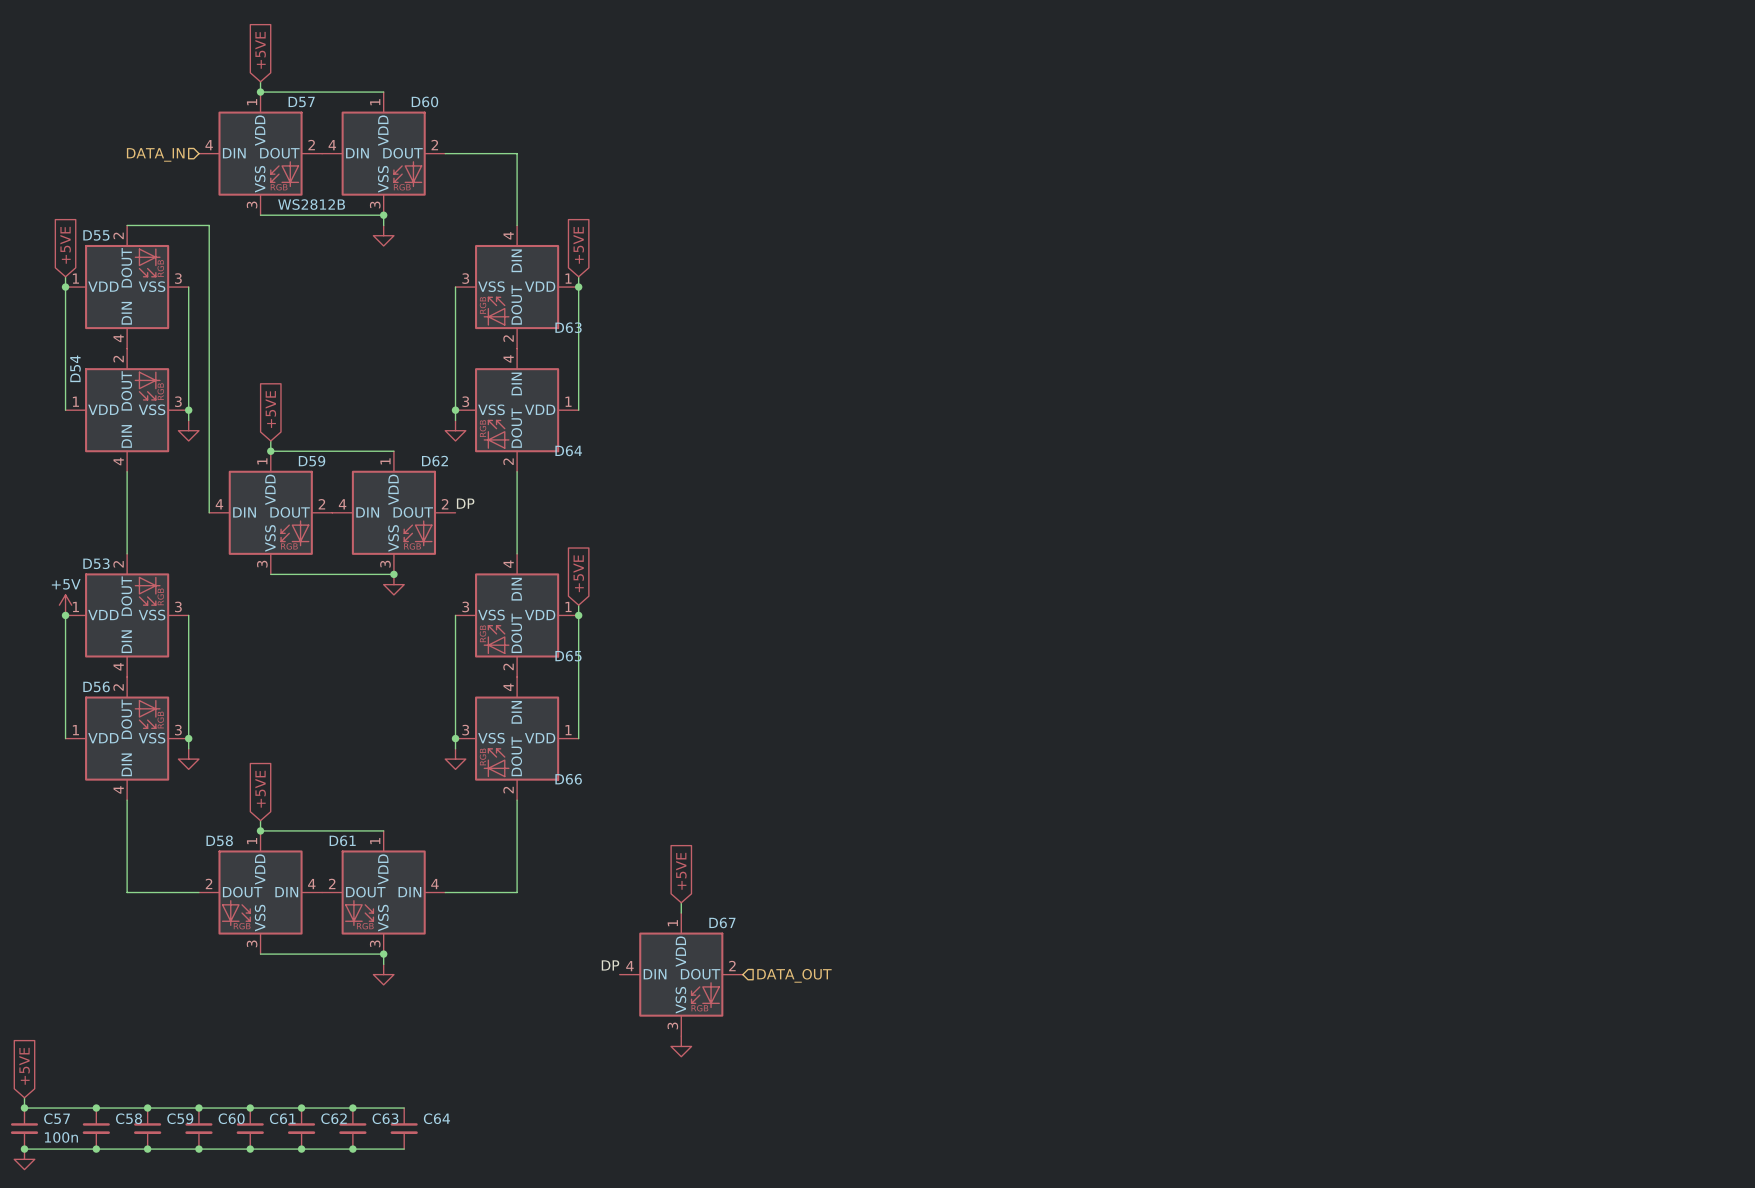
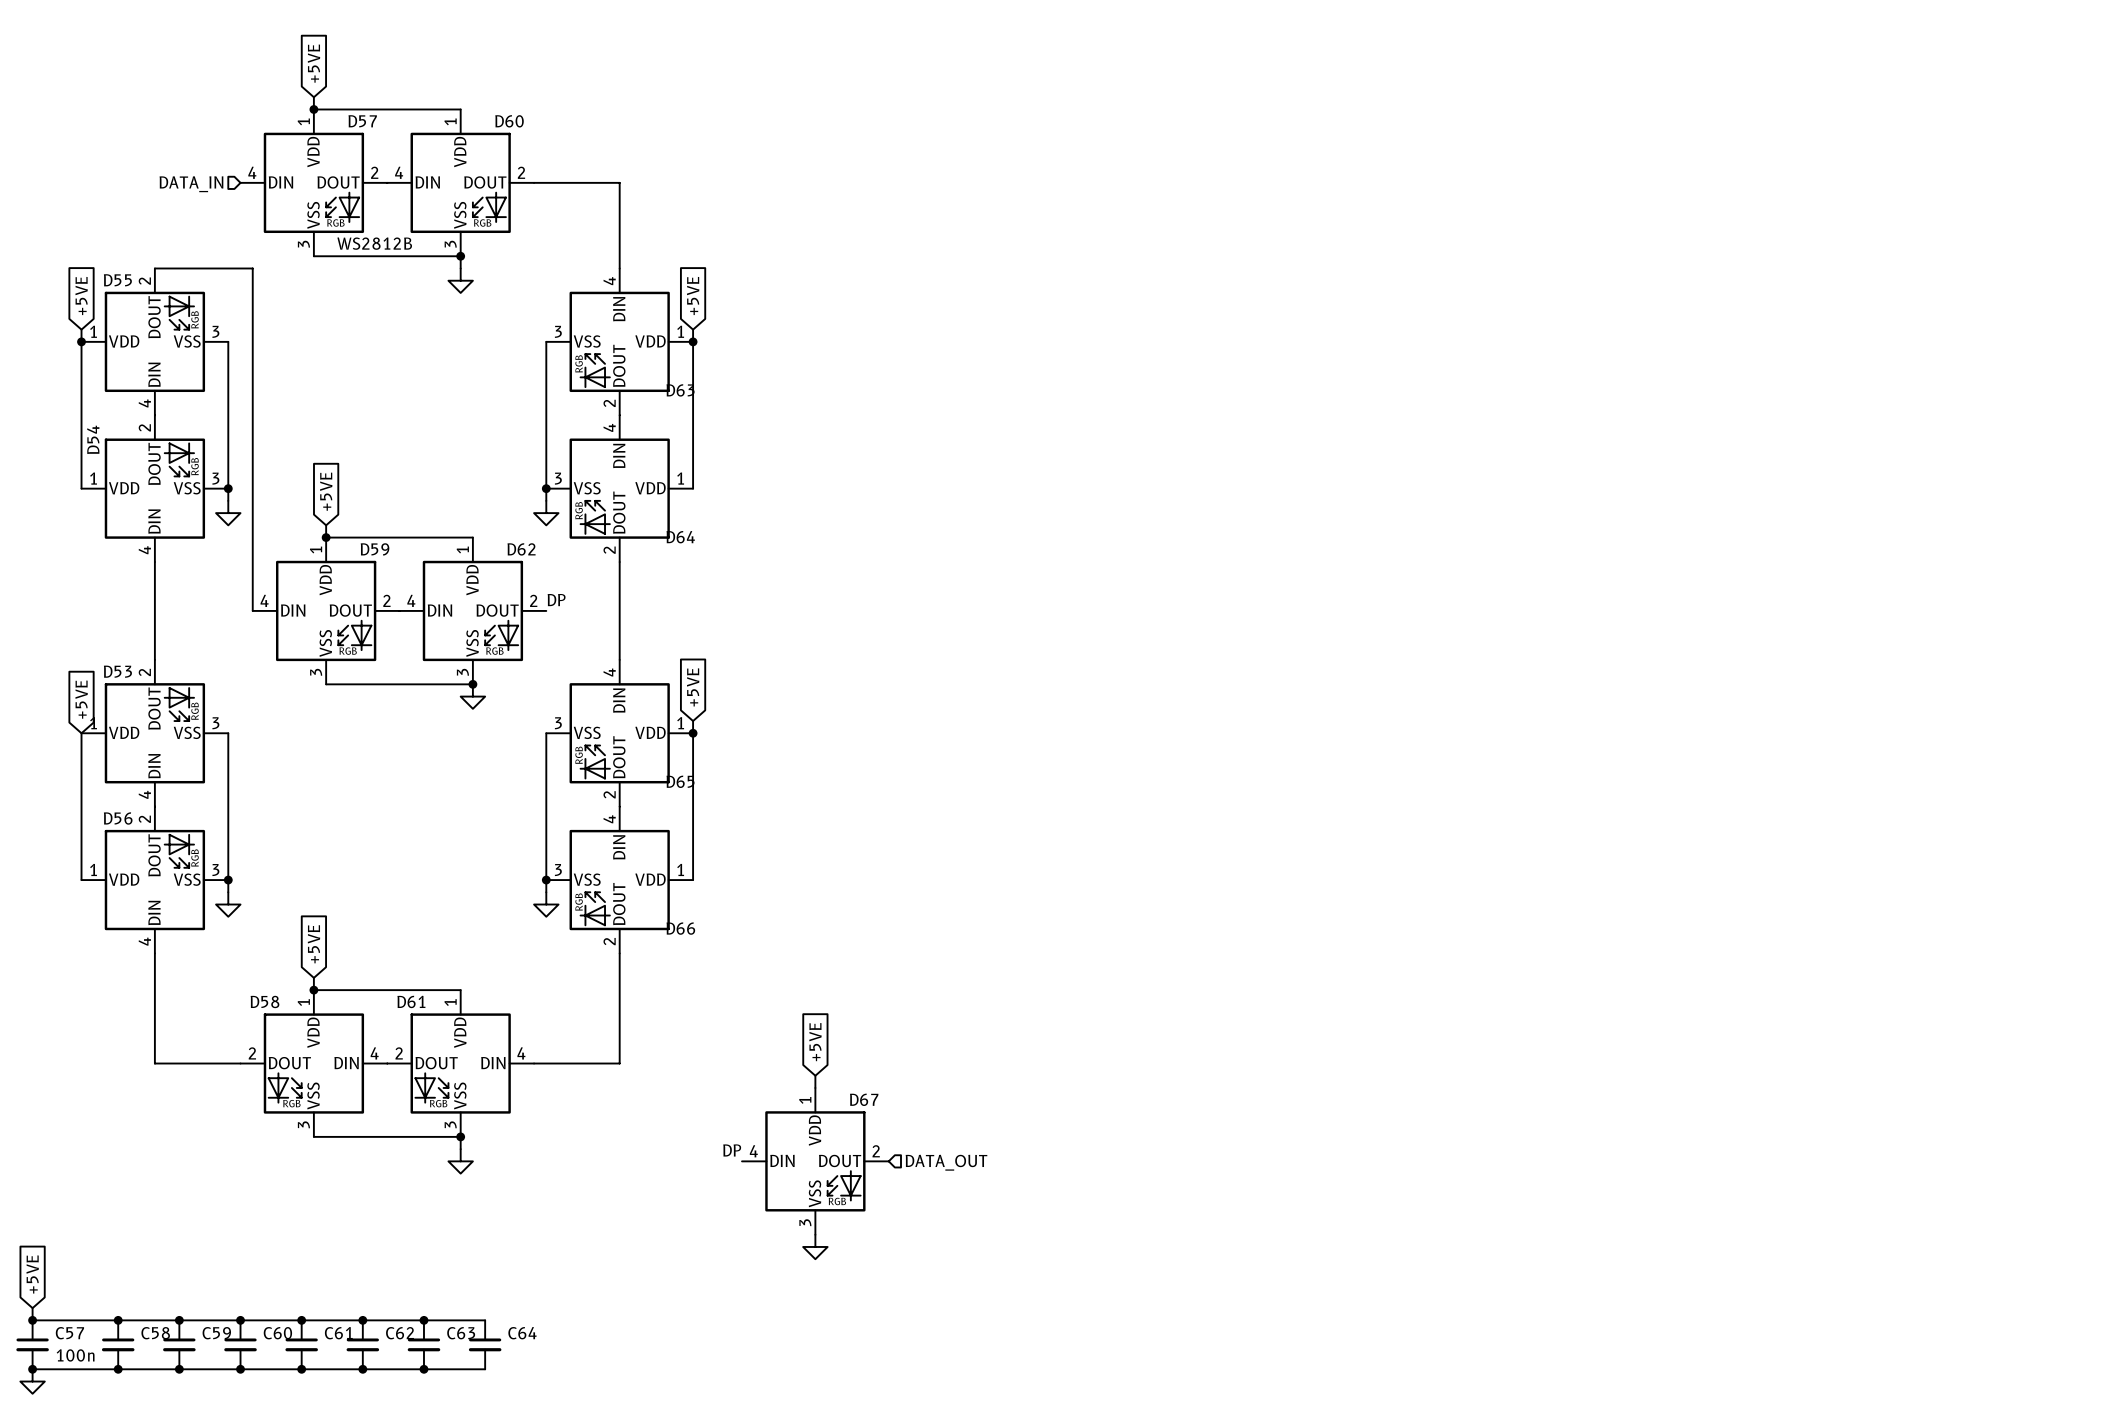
global label: none -> +5VE (81, 699)
power symbol: +5V (65, 605) -> none
junction: (65, 615) -> none

